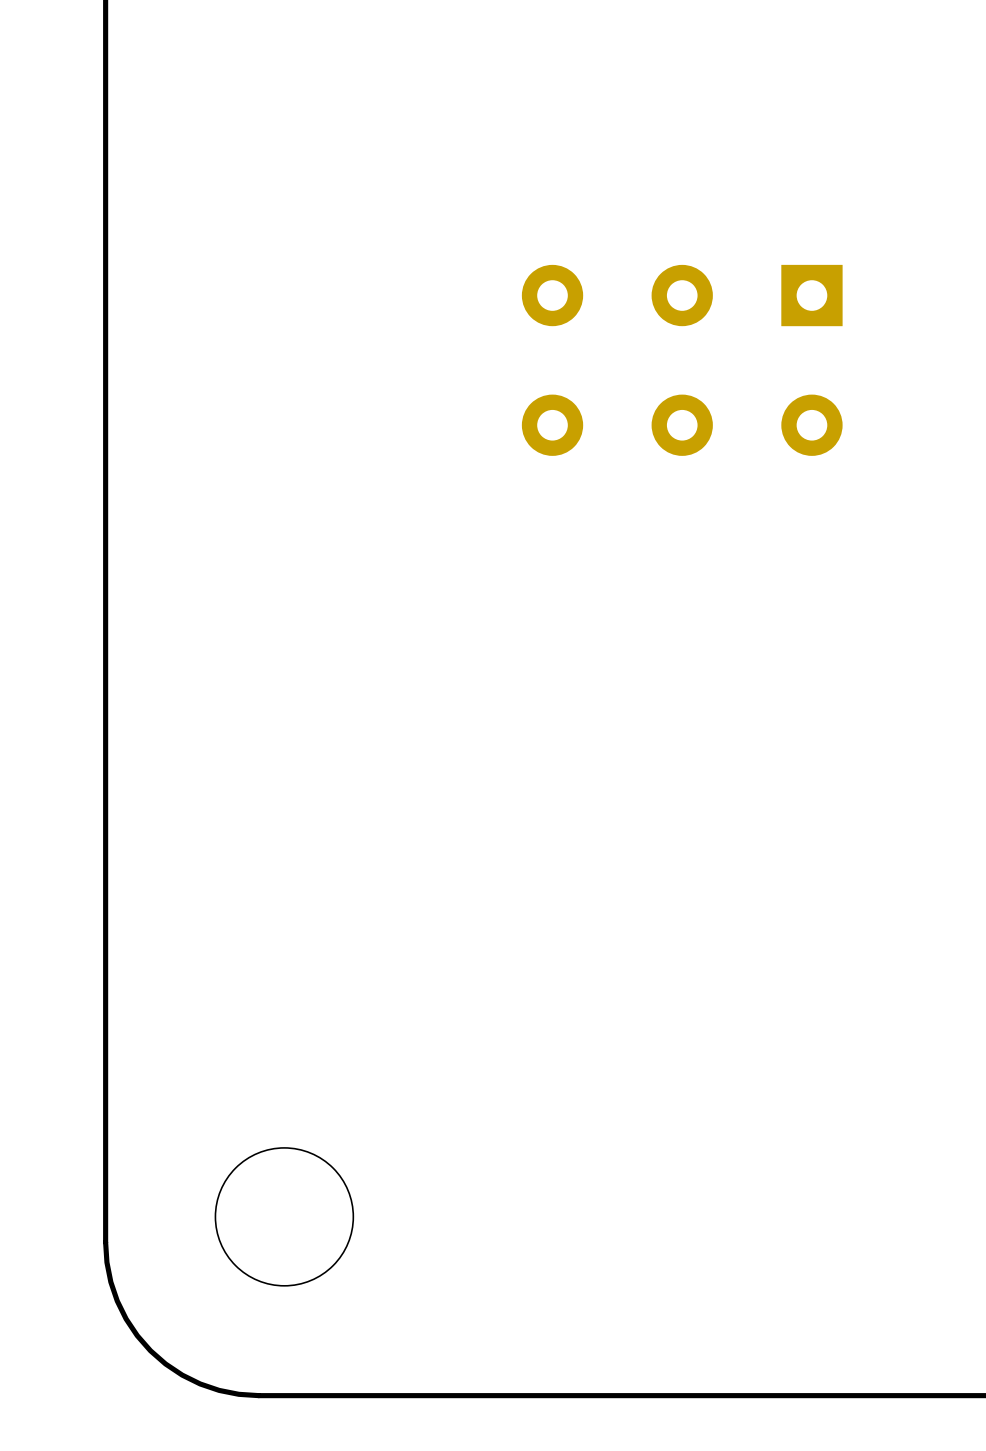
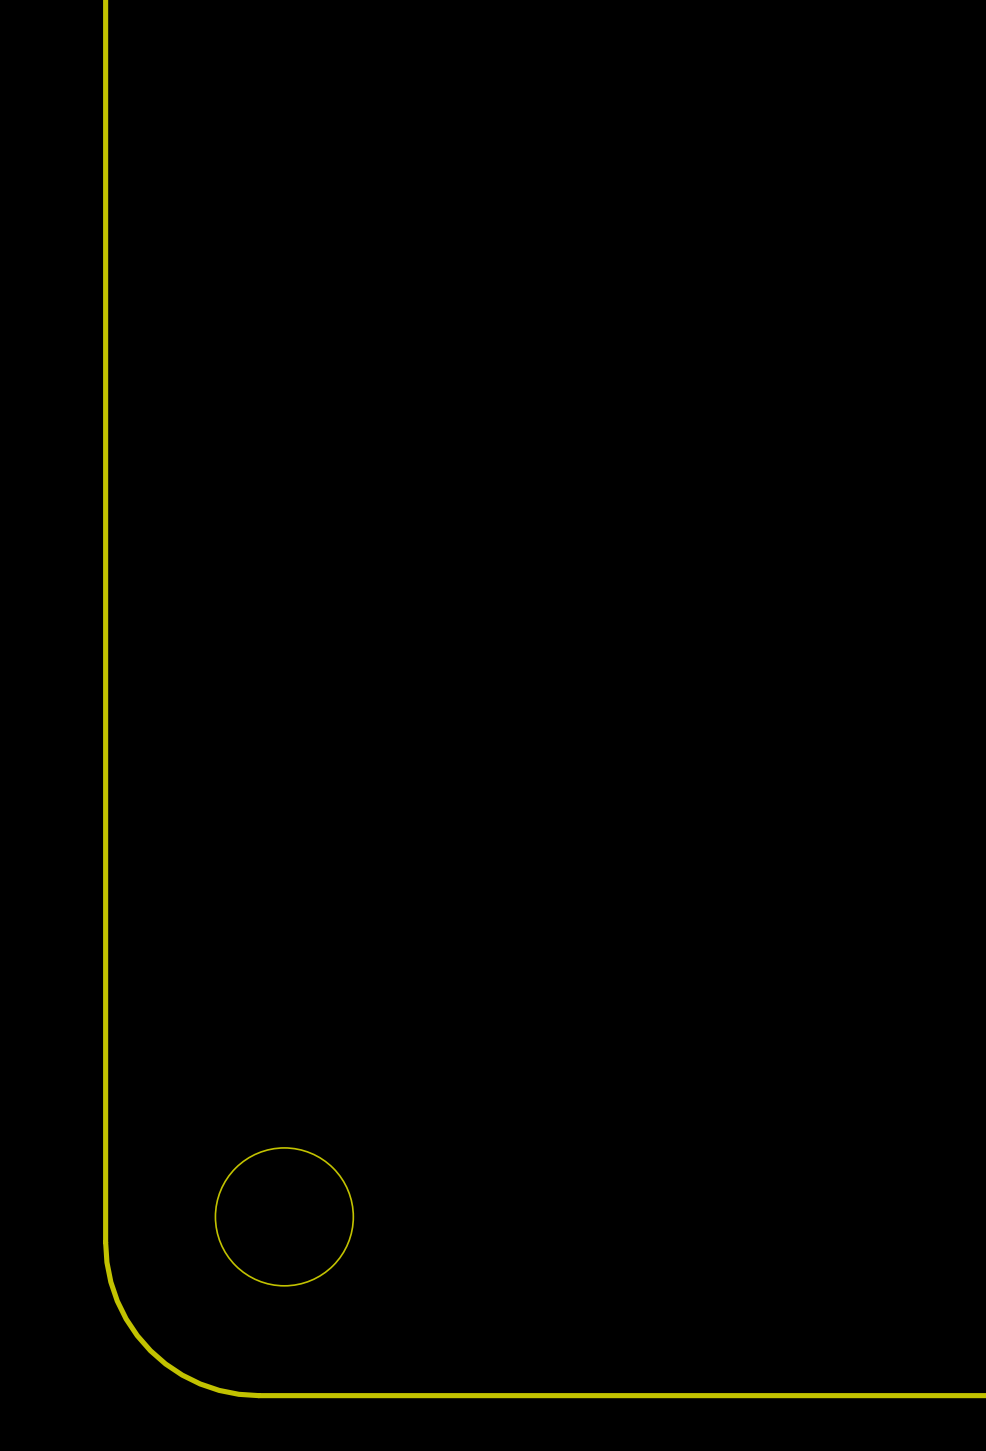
part: (682, 360) -> none

